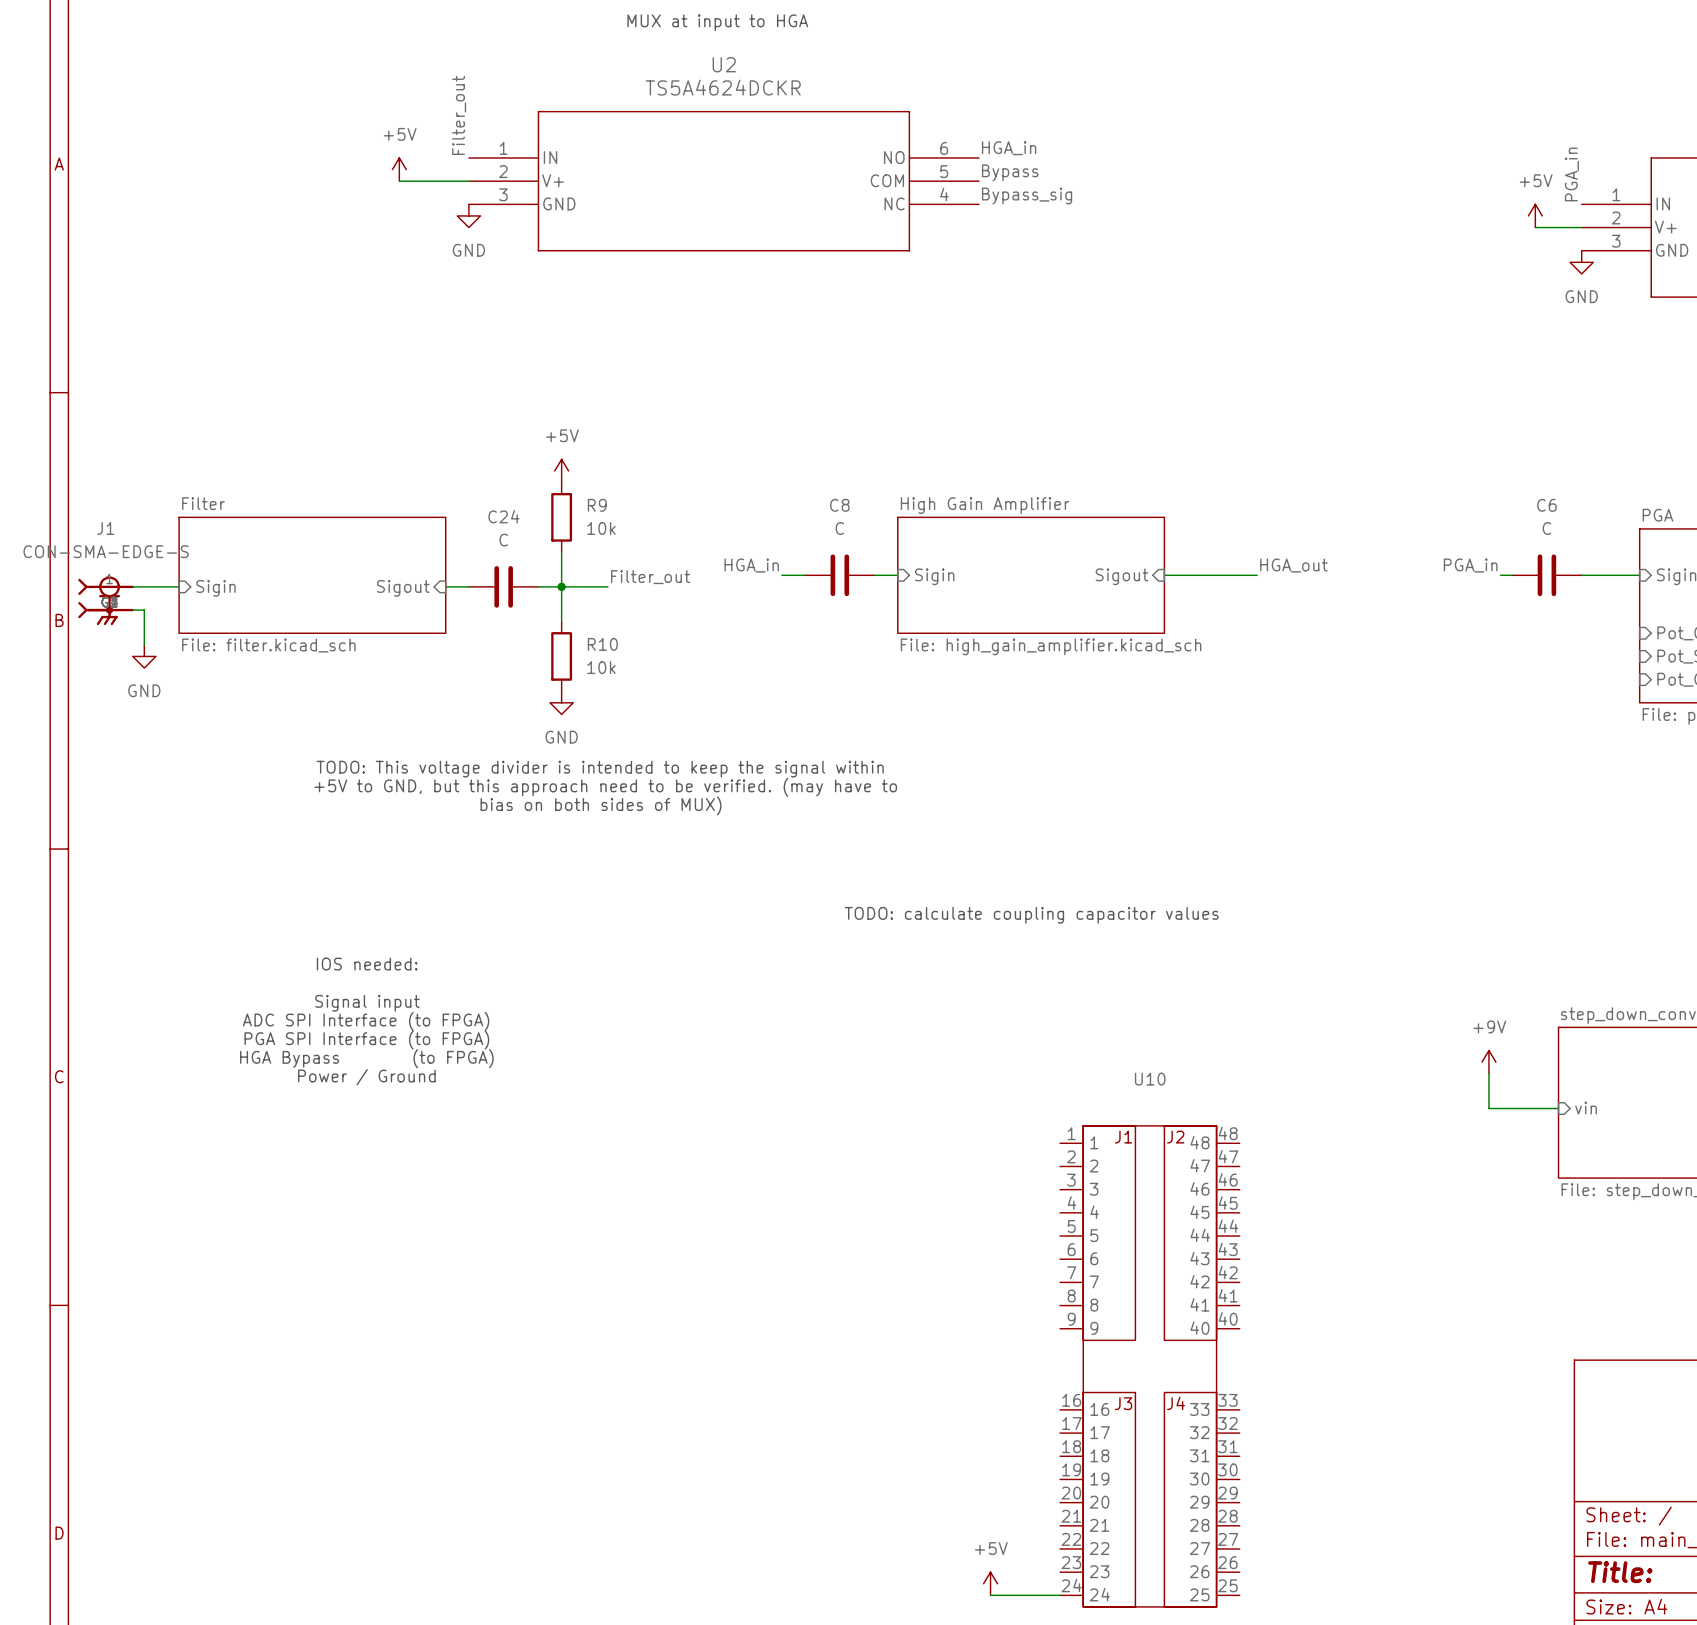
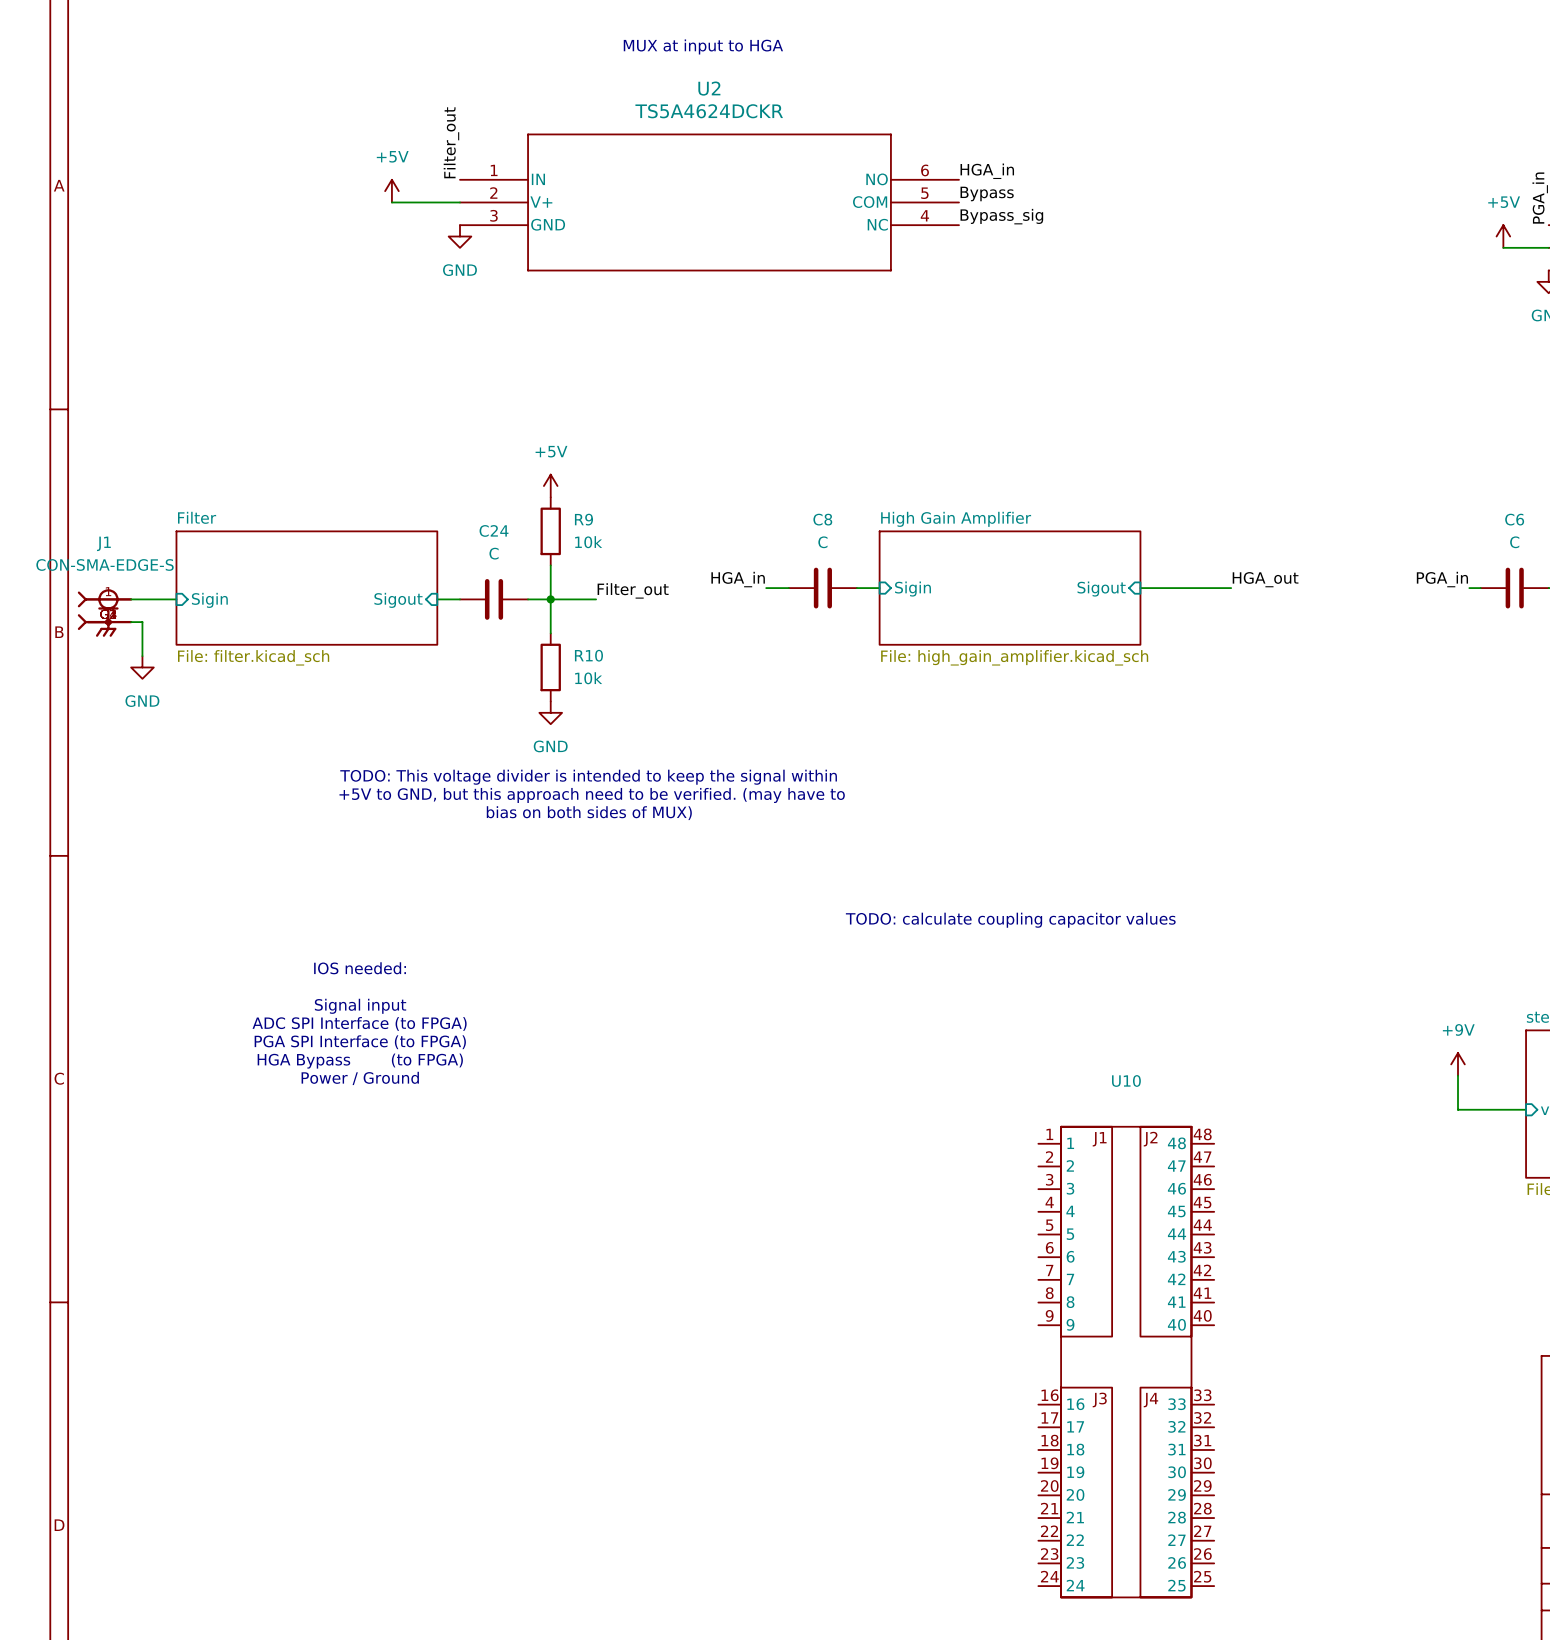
power symbol: +5V (990, 1583) -> none
wire: (990, 1595) (1060, 1595) -> none

